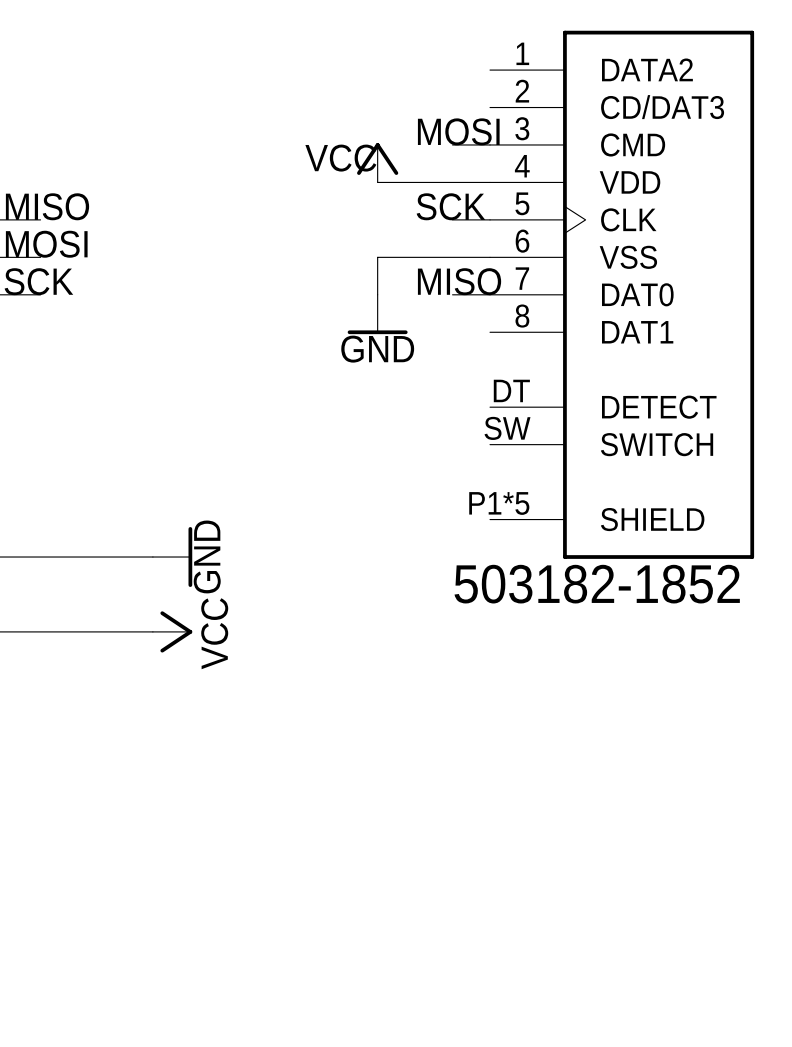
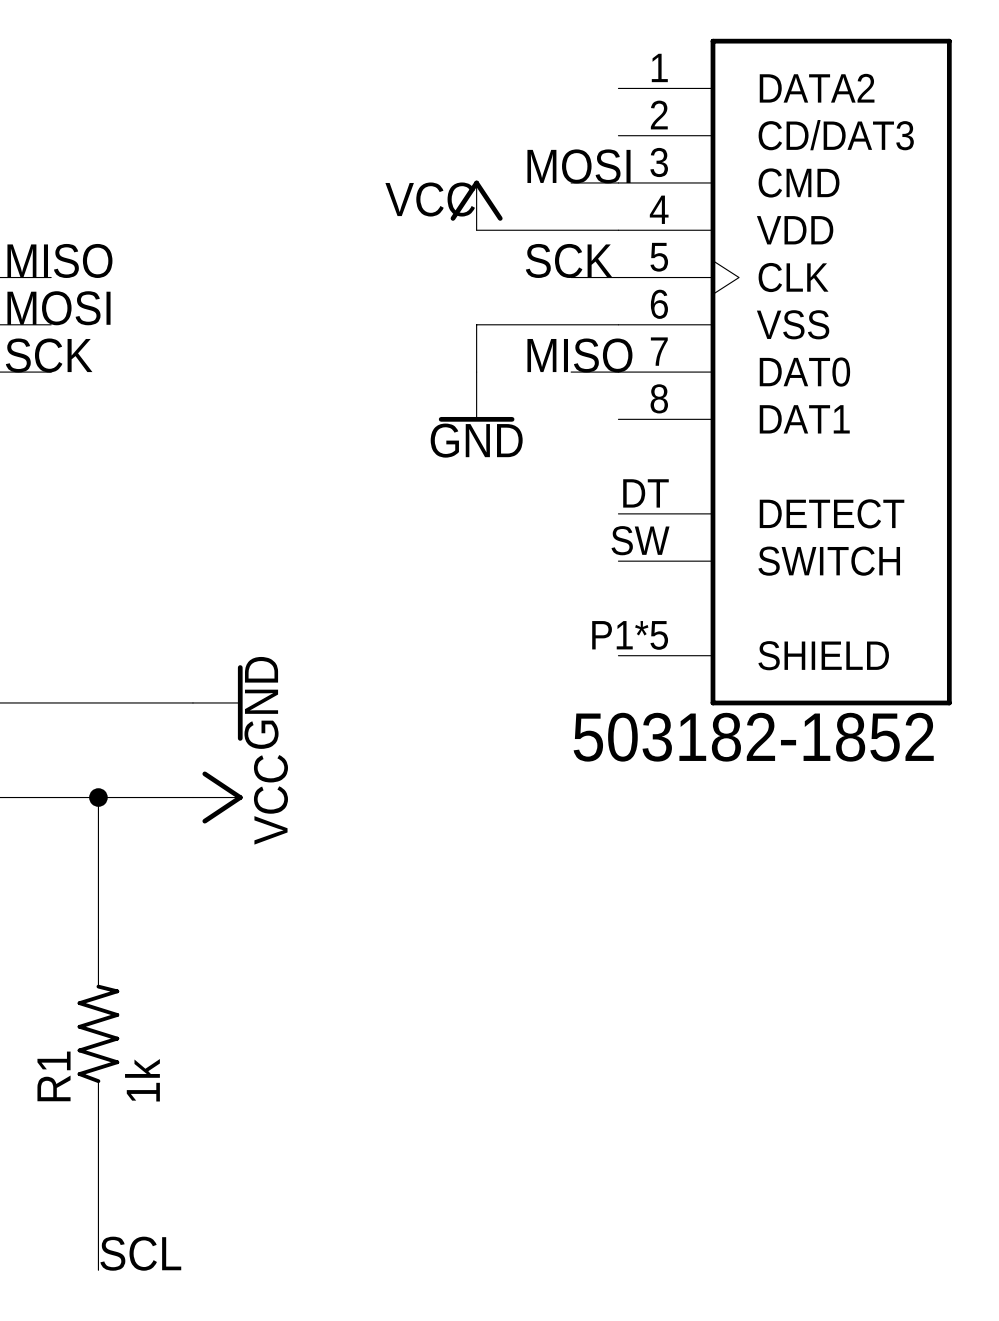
wire: none -> (98, 797) (98, 939)
junction: none -> (98, 797)
R1: none -> 1k (98, 1033)
wire: none -> (98, 1128) (98, 1270)
label: none -> SCL (140, 1253)

